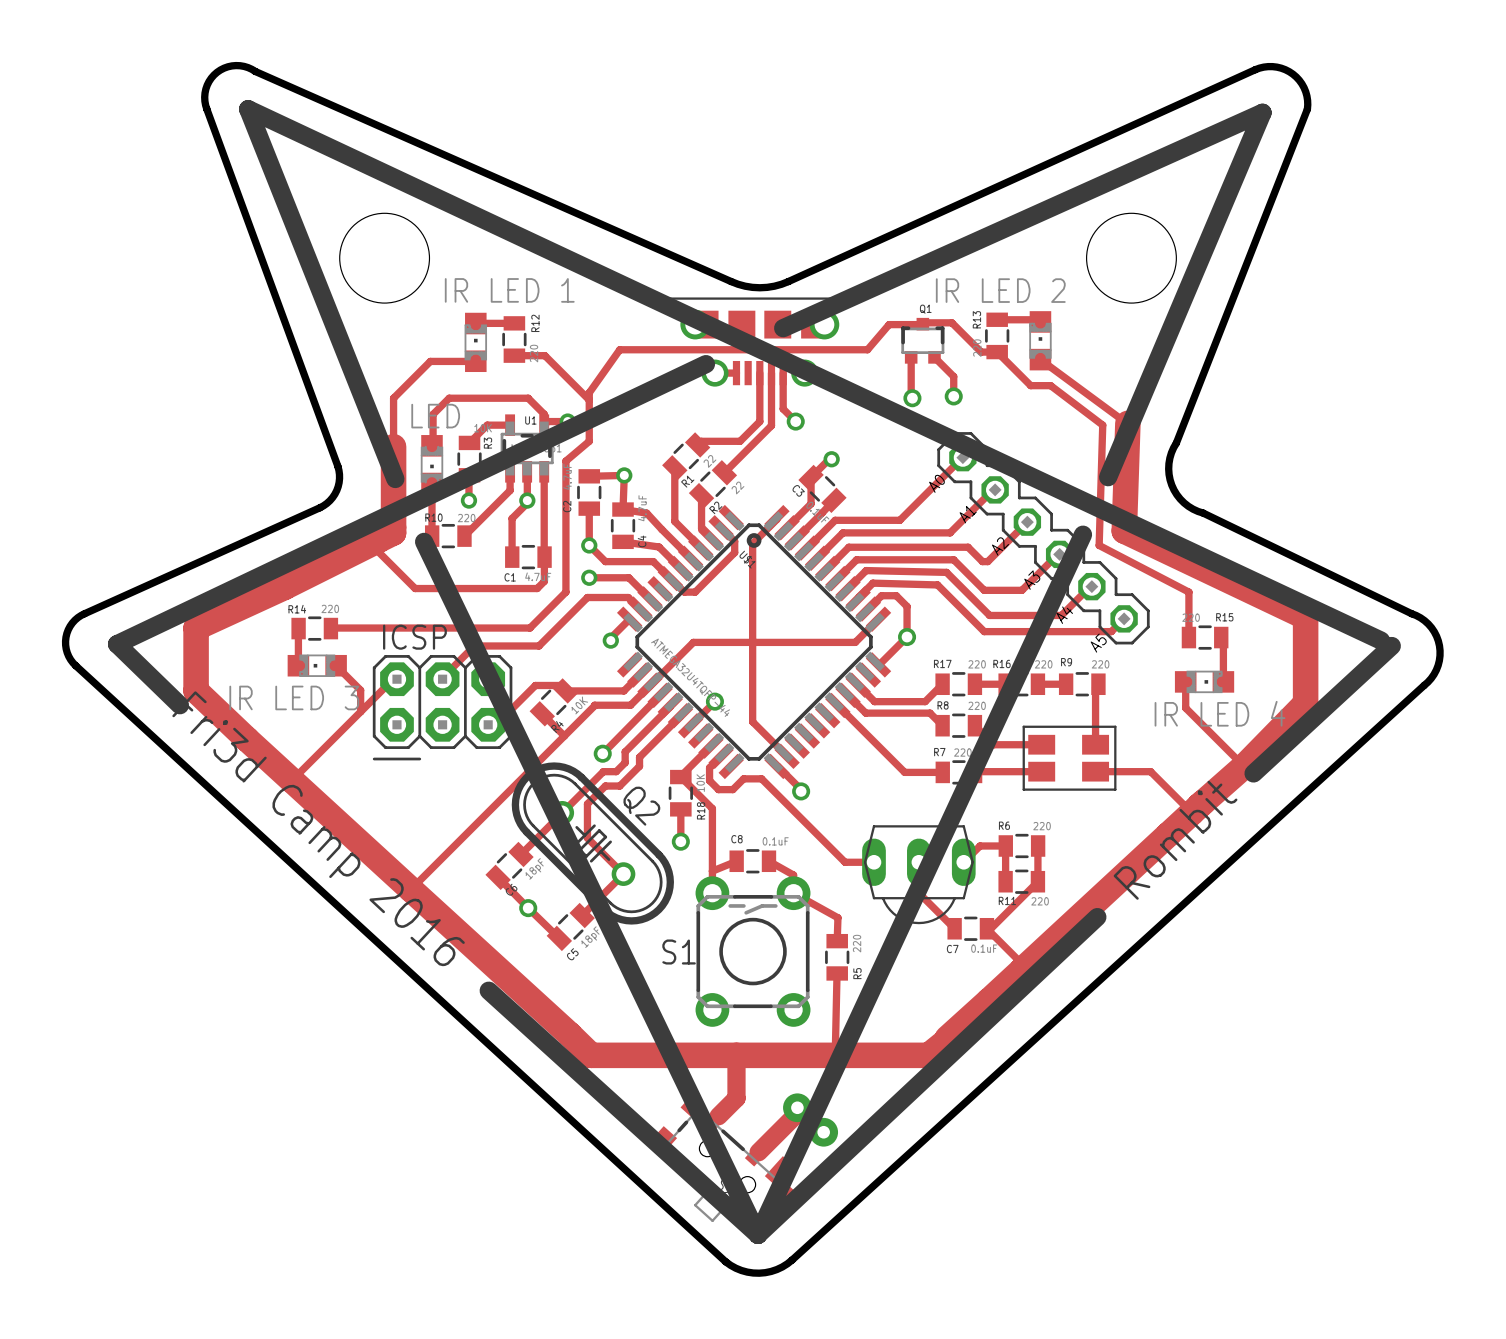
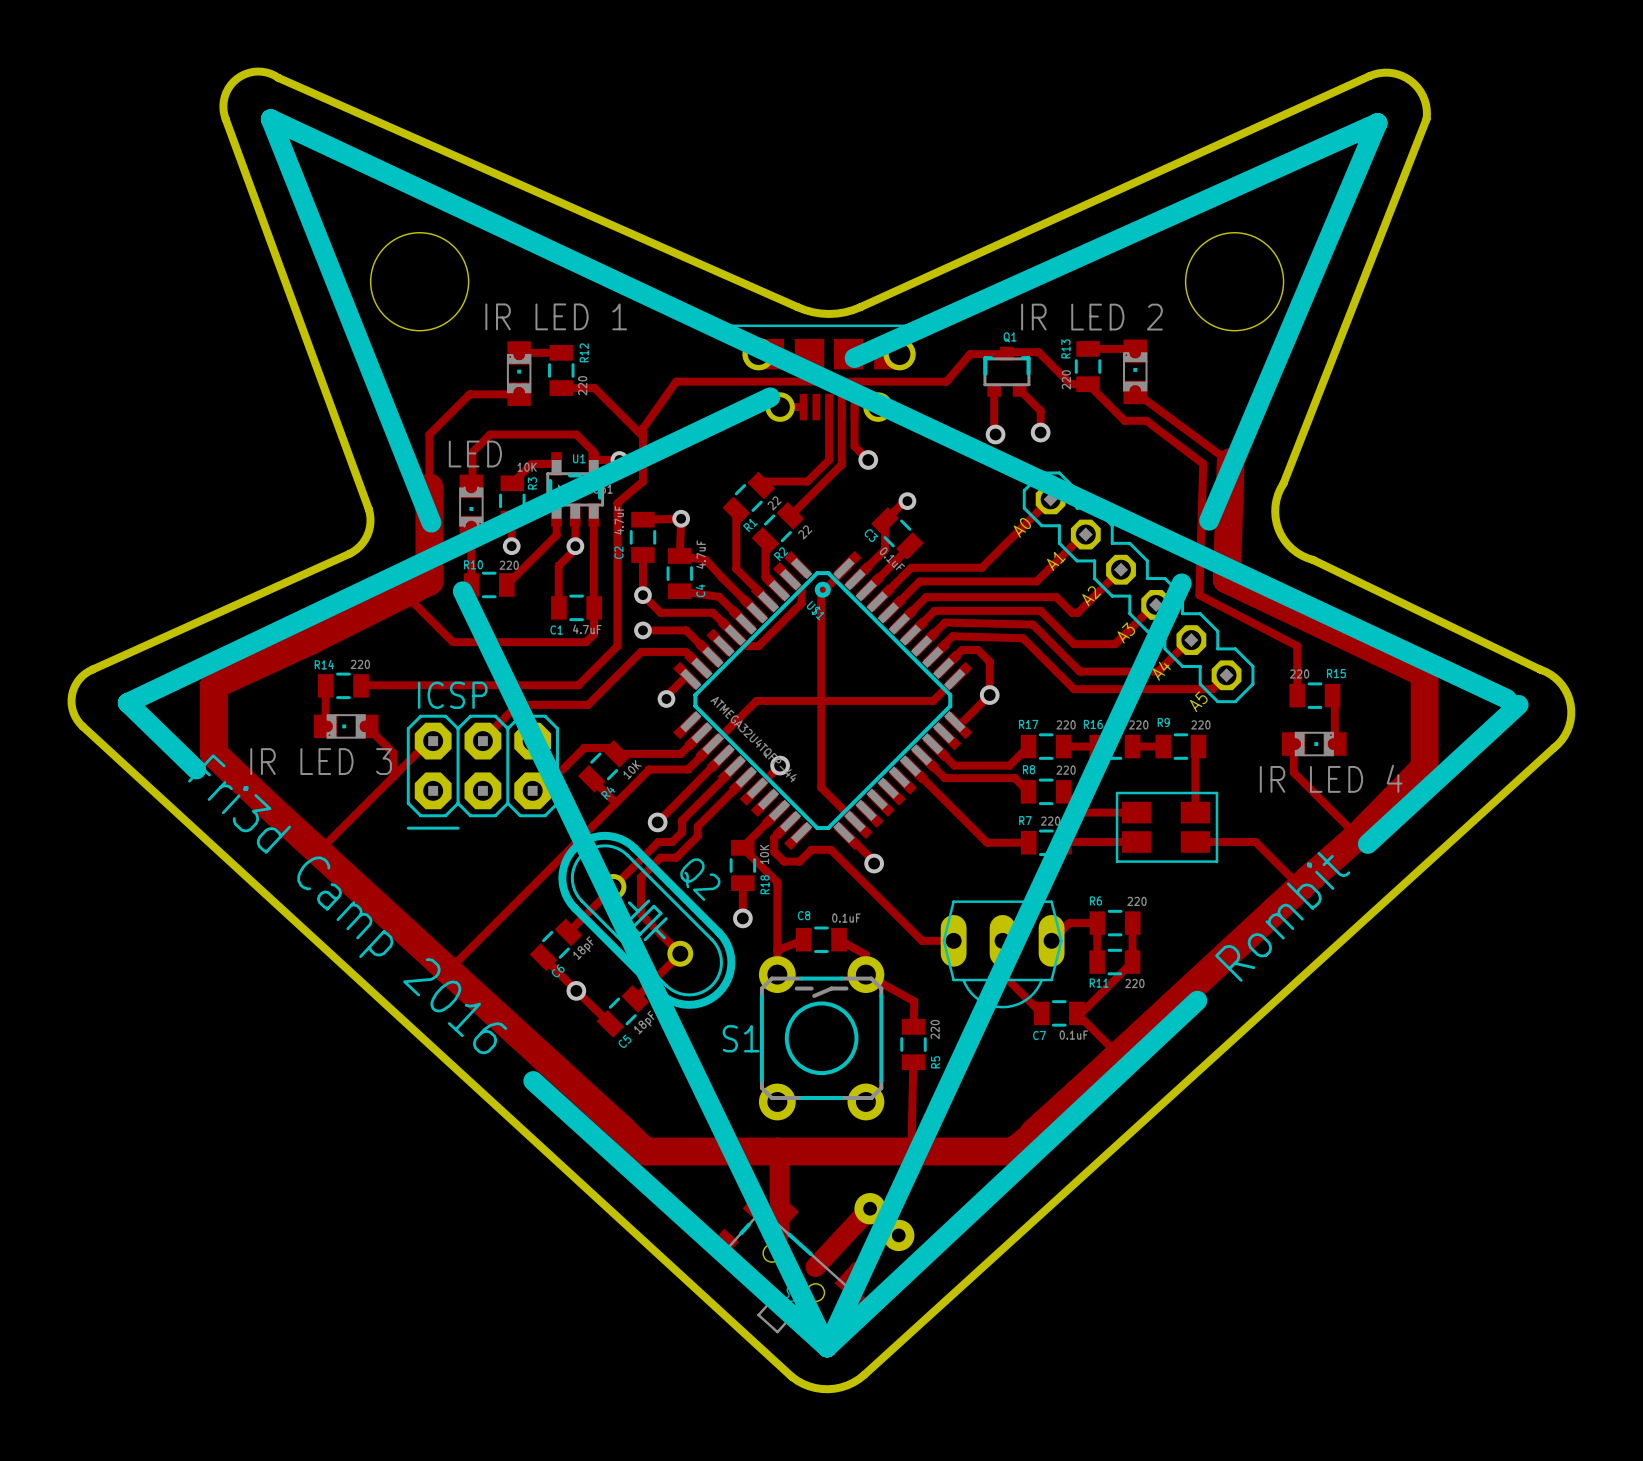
track: none -> (778, 1151) (779, 1233)
track: (736, 1055) (736, 1098) (718, 1116) -> none
track: (797, 1107) (795, 1115) (758, 1152) -> (869, 1208) (815, 1267)

